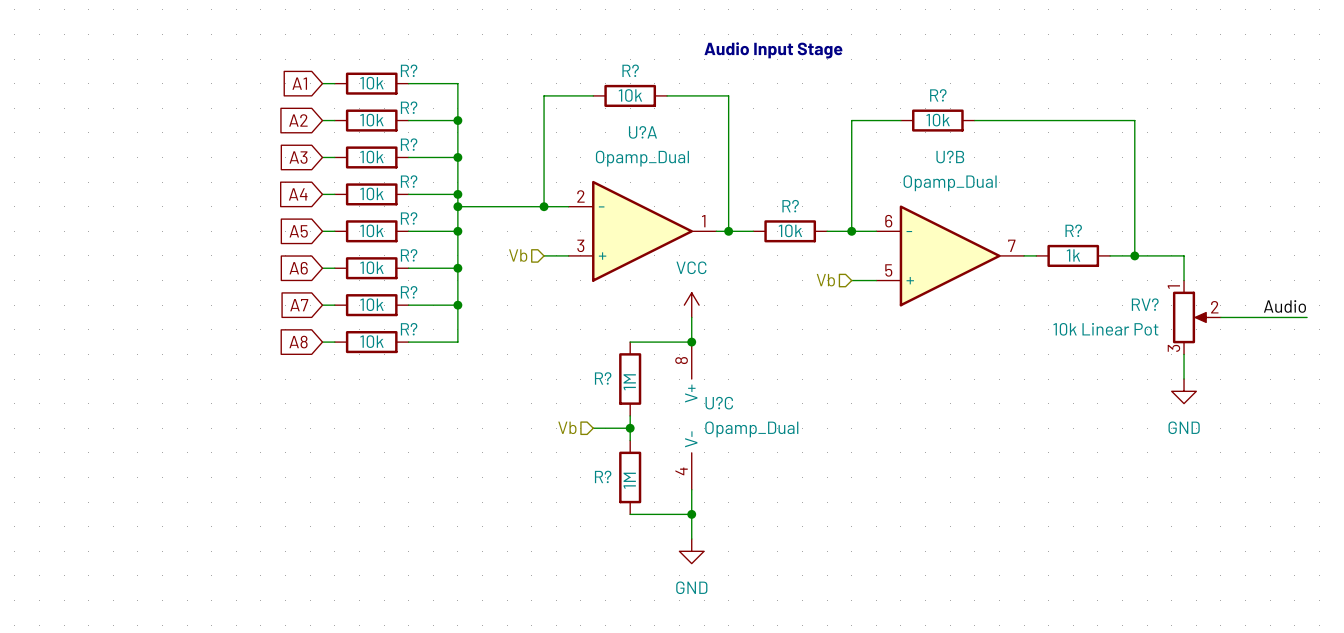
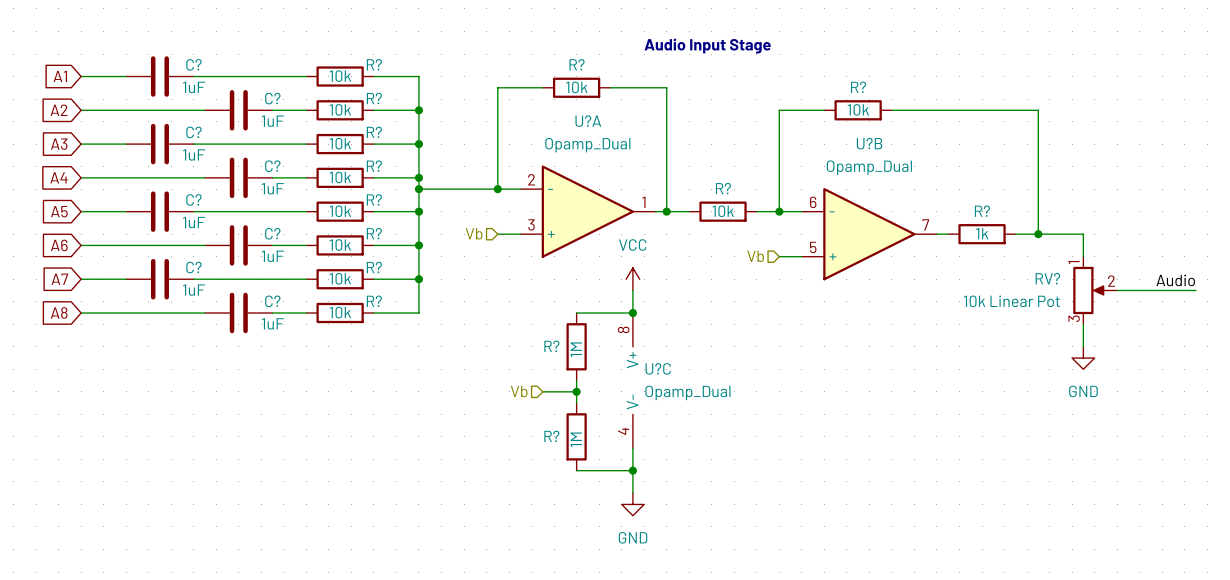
wire: none -> (81, 76) (126, 76)
C?: none -> 1uF (159, 76)
wire: none -> (193, 76) (295, 76)
global label position: A1 (299, 83) -> A1 (60, 76)
wire: none -> (81, 110) (205, 110)
C?: none -> 1uF (238, 110)
wire: none -> (272, 110) (295, 110)
global label position: A2 (298, 120) -> A2 (59, 110)
wire: none -> (81, 144) (126, 144)
C?: none -> 1uF (159, 144)
wire: none -> (193, 144) (295, 144)
global label position: A3 (298, 157) -> A3 (59, 144)
wire: none -> (81, 177) (205, 177)
C?: none -> 1uF (238, 177)
wire: none -> (272, 177) (295, 177)
global label position: A4 (298, 194) -> A4 (58, 177)
wire: none -> (81, 211) (126, 211)
C?: none -> 1uF (159, 211)
wire: none -> (193, 211) (295, 211)
global label position: A5 (298, 231) -> A5 (59, 211)
wire: none -> (81, 245) (205, 245)
C?: none -> 1uF (238, 245)
wire: none -> (272, 245) (295, 245)
global label position: A6 (298, 268) -> A6 (59, 245)
wire: none -> (81, 279) (126, 279)
C?: none -> 1uF (159, 279)
wire: none -> (193, 279) (295, 279)
global label position: A7 (299, 305) -> A7 (59, 279)
wire: none -> (81, 313) (205, 313)
C?: none -> 1uF (238, 313)
wire: none -> (272, 313) (295, 313)
global label position: A8 (298, 342) -> A8 (59, 312)

